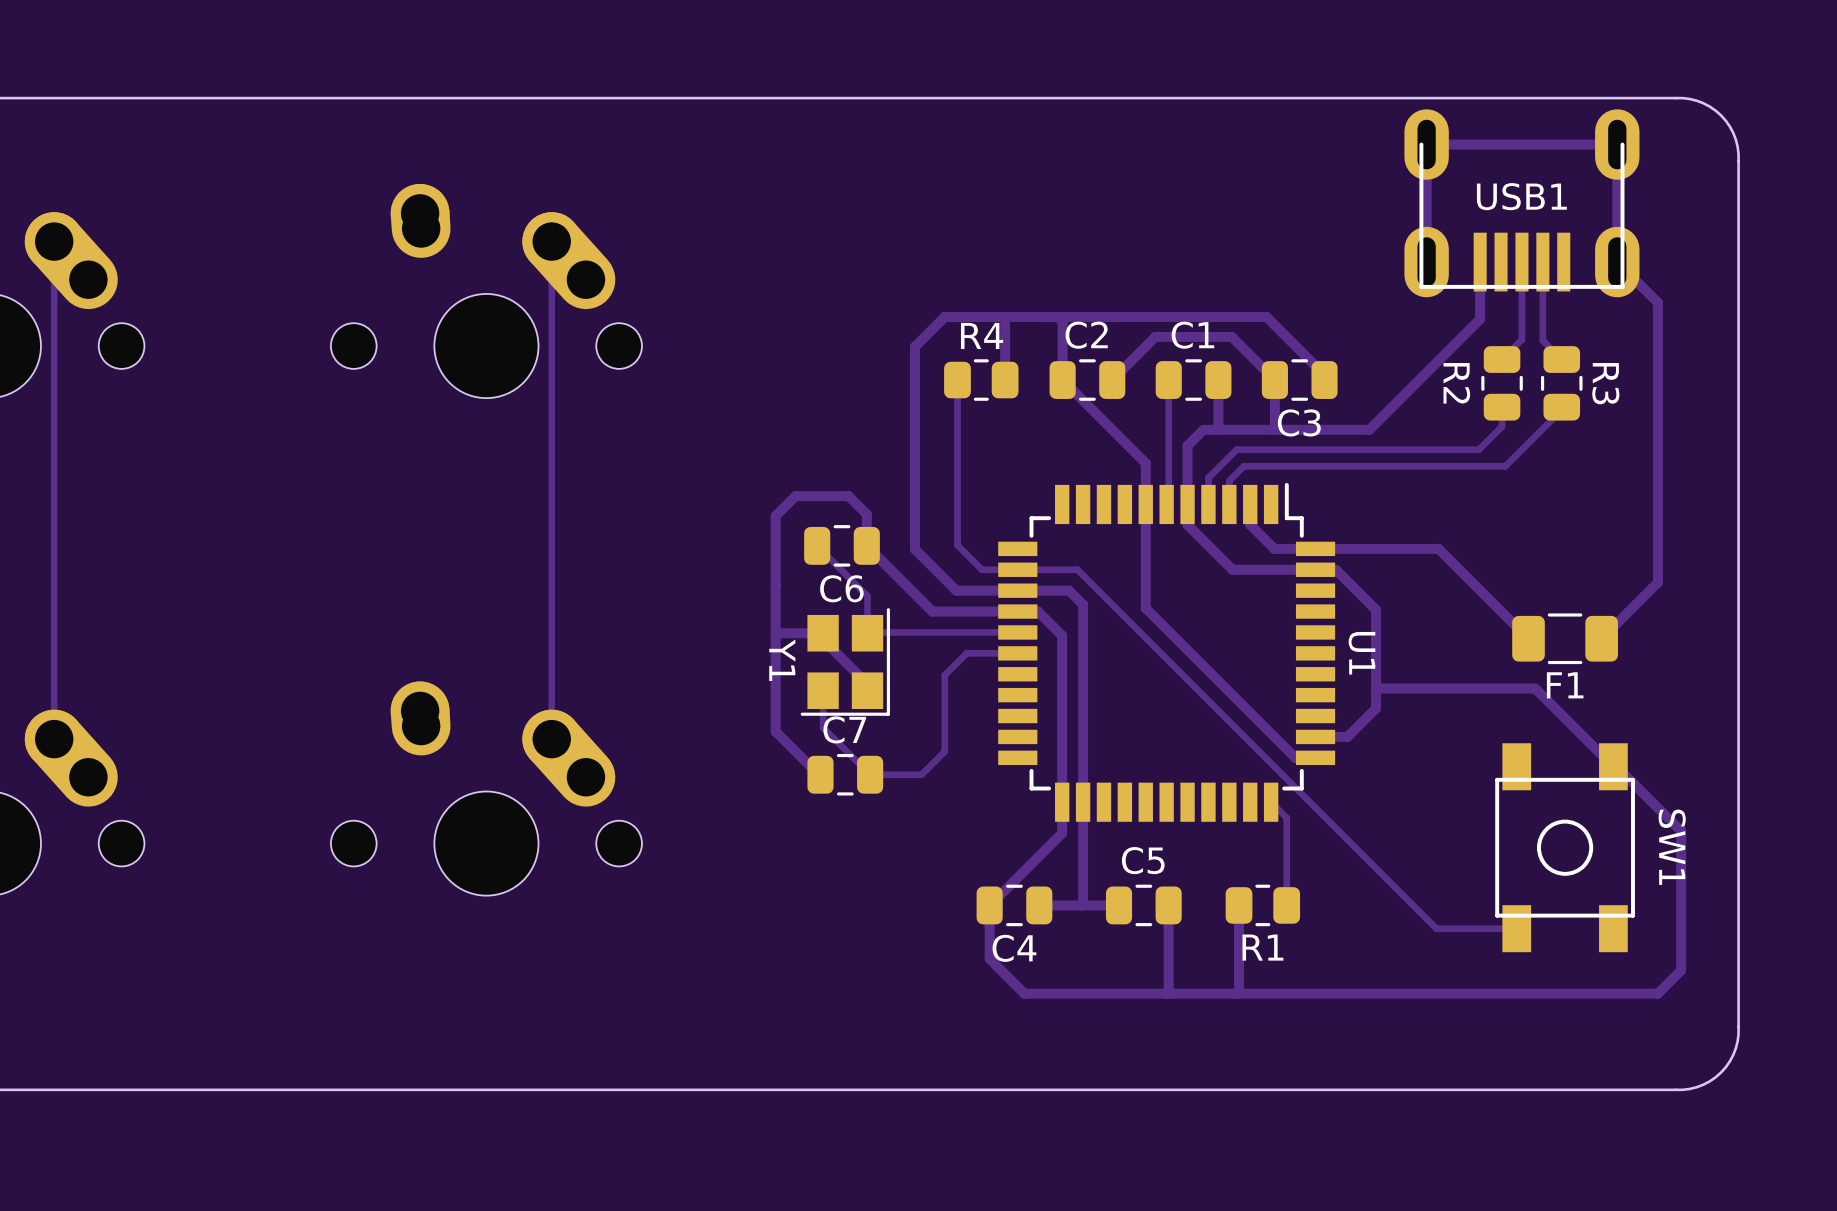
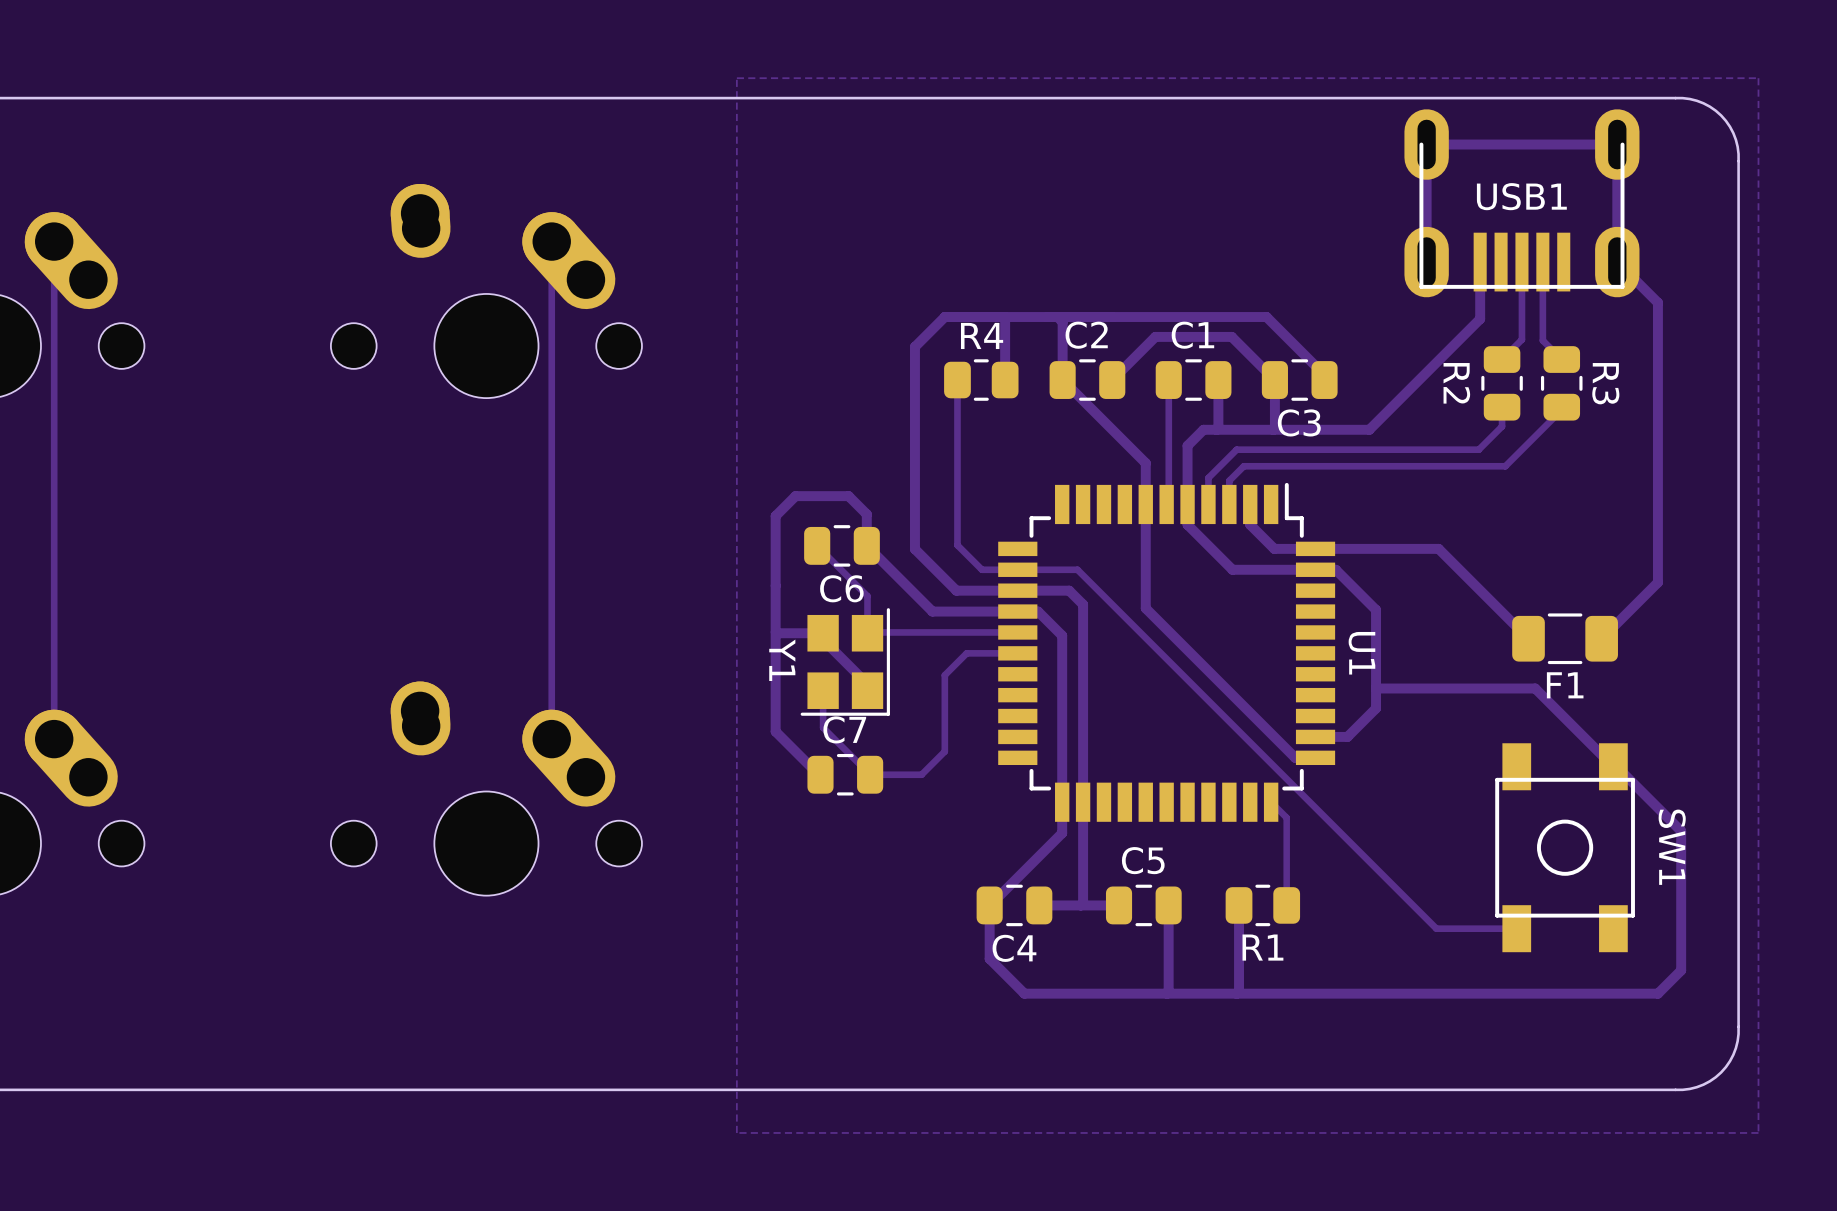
zone outline: none -> (1758, 78) (736, 78) (736, 1132) (1758, 1132) (1758, 78)

